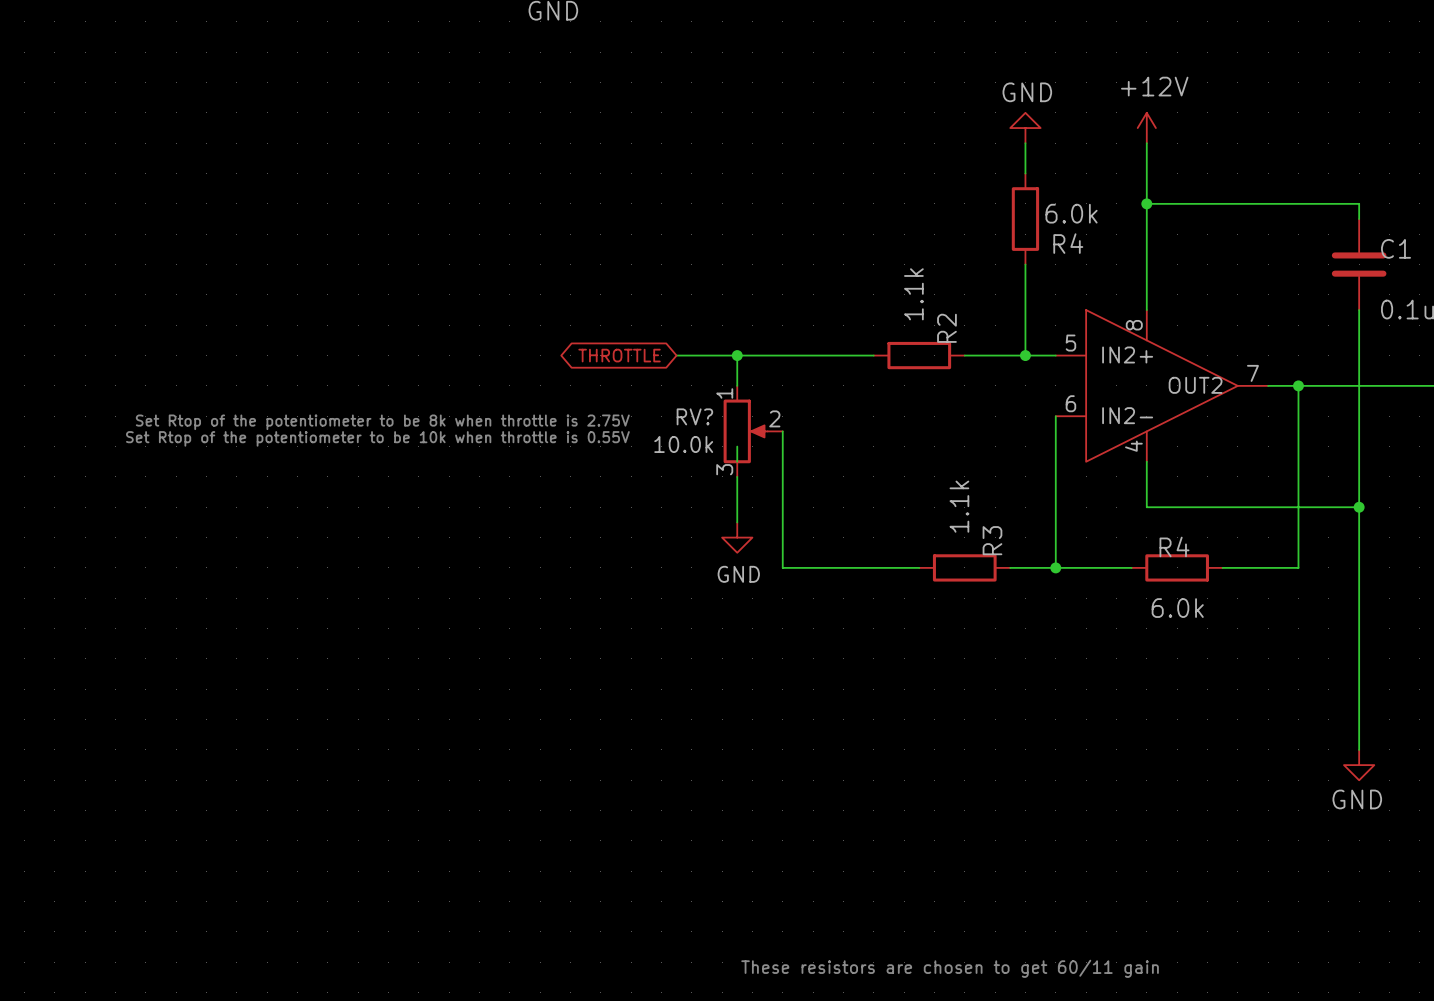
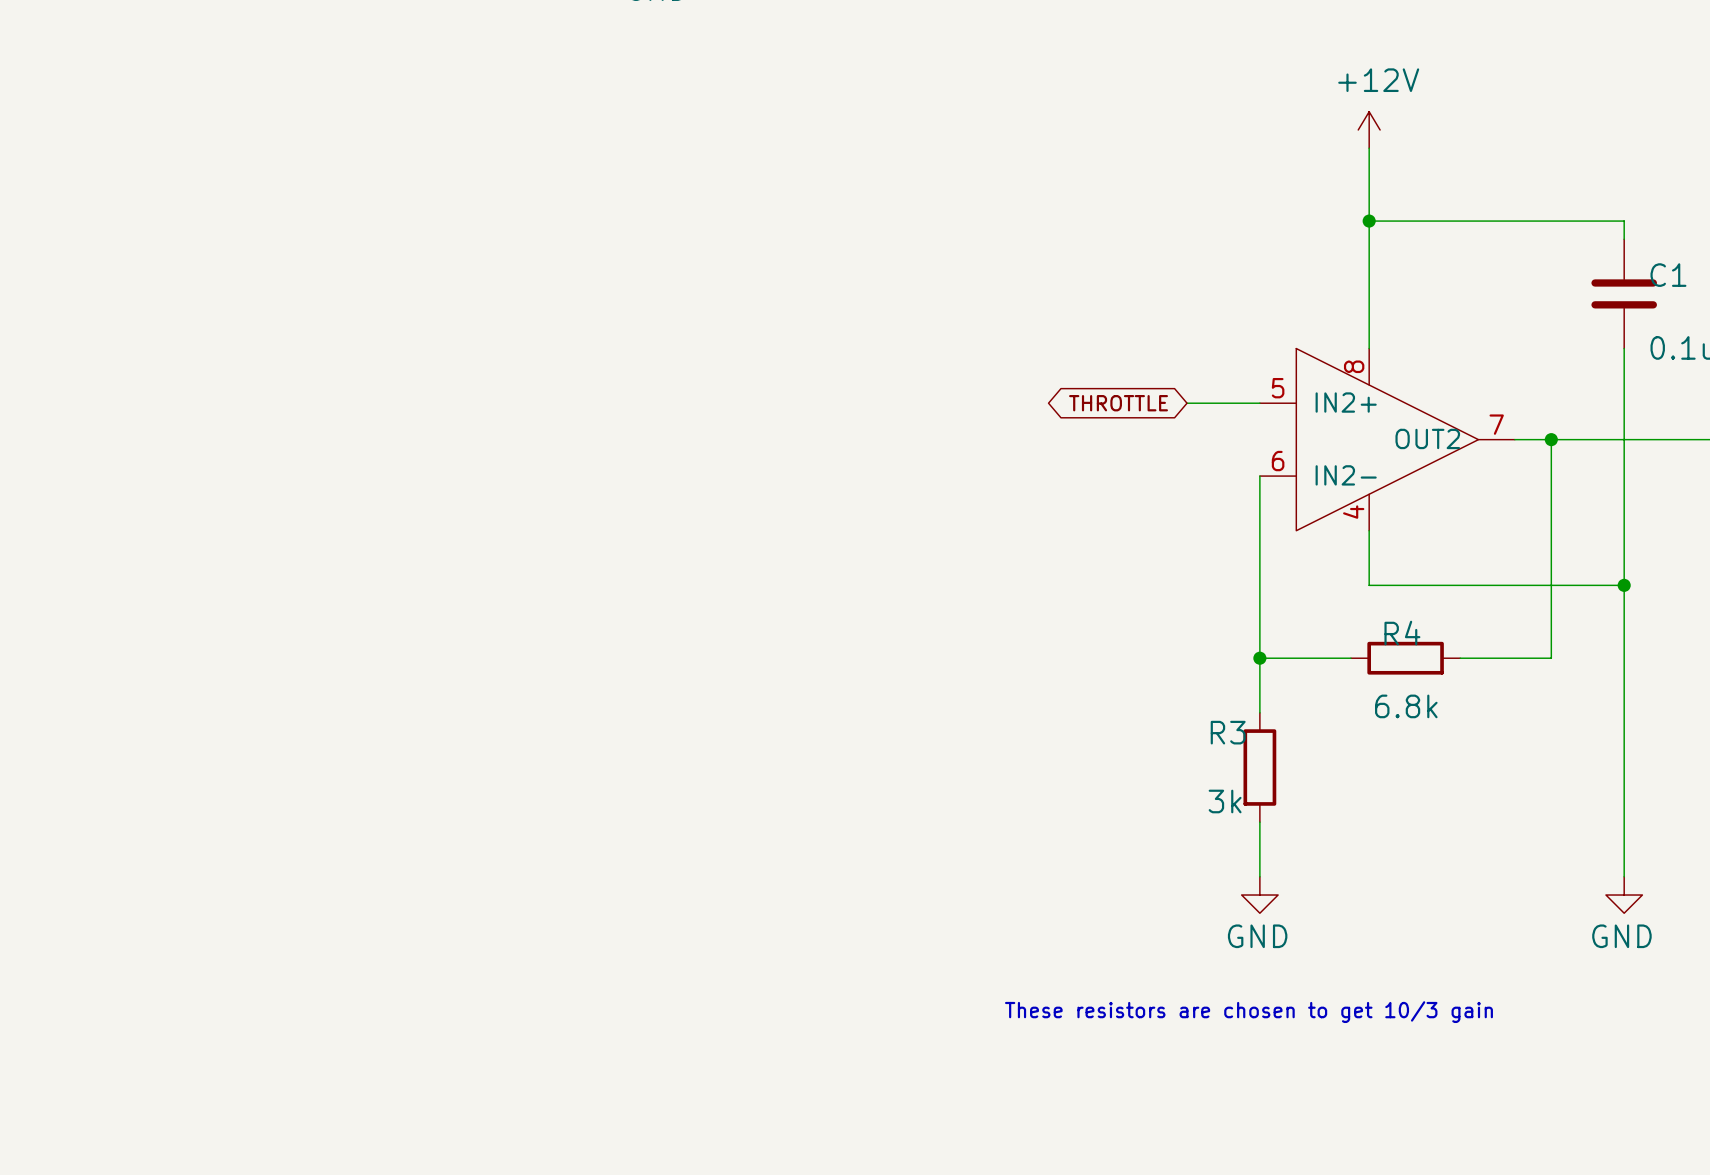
power symbol: GND (1025, 128) -> none
wire: (1025, 143) (1025, 173) -> none
R4: 6.0k (1025, 219) -> none
wire: (1025, 264) (1025, 355) -> none
global label: THROTTLE (619, 355) -> none
wire: (676, 355) (873, 355) -> none
wire: (737, 355) (737, 385) -> none
junction: (737, 355) -> none
R2: 1.1k (919, 355) -> none
global label: none -> THROTTLE (1118, 403)
wire: (964, 355) (995, 355) -> none
junction: (1025, 355) -> none
text: Set Rtop of the potentiometer to be 8k when throttle is 2.75V (382, 422) -> none
RV?: 10.0k (753, 431) -> none
wire: (782, 431) (782, 567) (919, 567) -> none
text: Set Rtop of the potentiometer to be 10k when throttle is 0.55V (377, 438) -> none
wire: (737, 446) (737, 461) -> none
wire: (737, 476) (737, 522) -> none
R3 value: 1.1k (959, 506) -> 3k (1225, 801)
power symbol: GND (737, 537) -> none
R3 name position: R3 (992, 540) -> R3 (1228, 732)
R3 rotation: 0° (964, 567) -> 90° clockwise (1259, 767)
R3 position: (964, 567) -> (1259, 767)
wire: (1010, 567) (1055, 567) -> (1259, 712) (1259, 658)
R4 value: 6.0k (1177, 608) -> 6.8k (1406, 706)
wire: none -> (1259, 822) (1259, 876)
power symbol: none -> GND (1259, 895)
text: none -> These resistors are chosen to get 10/3 gain (1248, 1012)
text: These resistors are chosen to get 60/11 gain (950, 968) -> none

